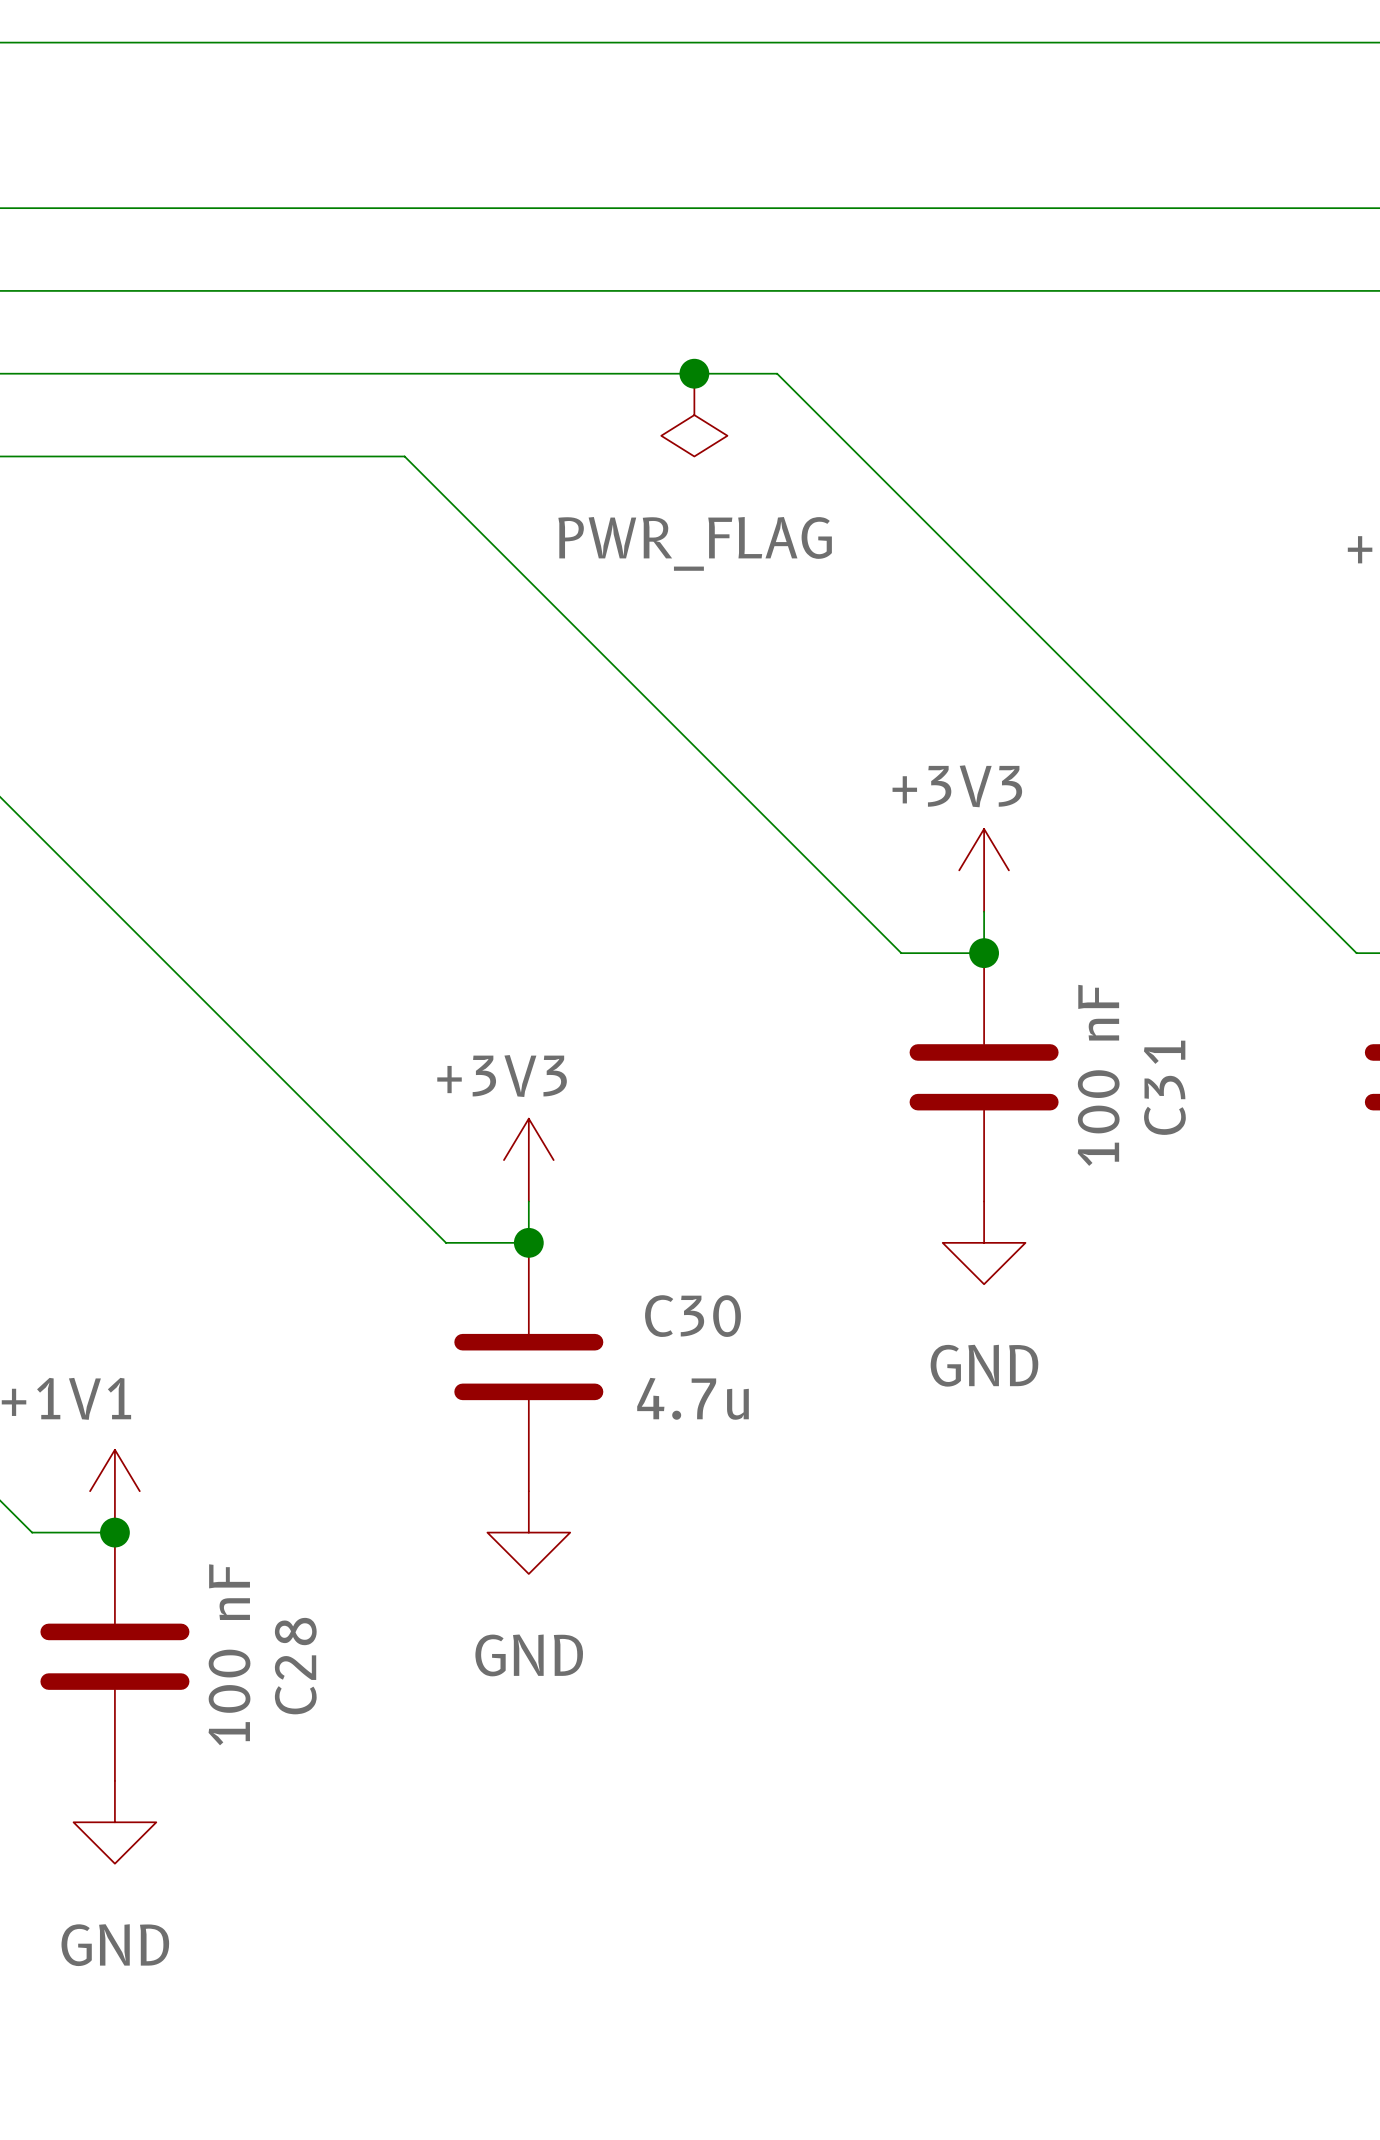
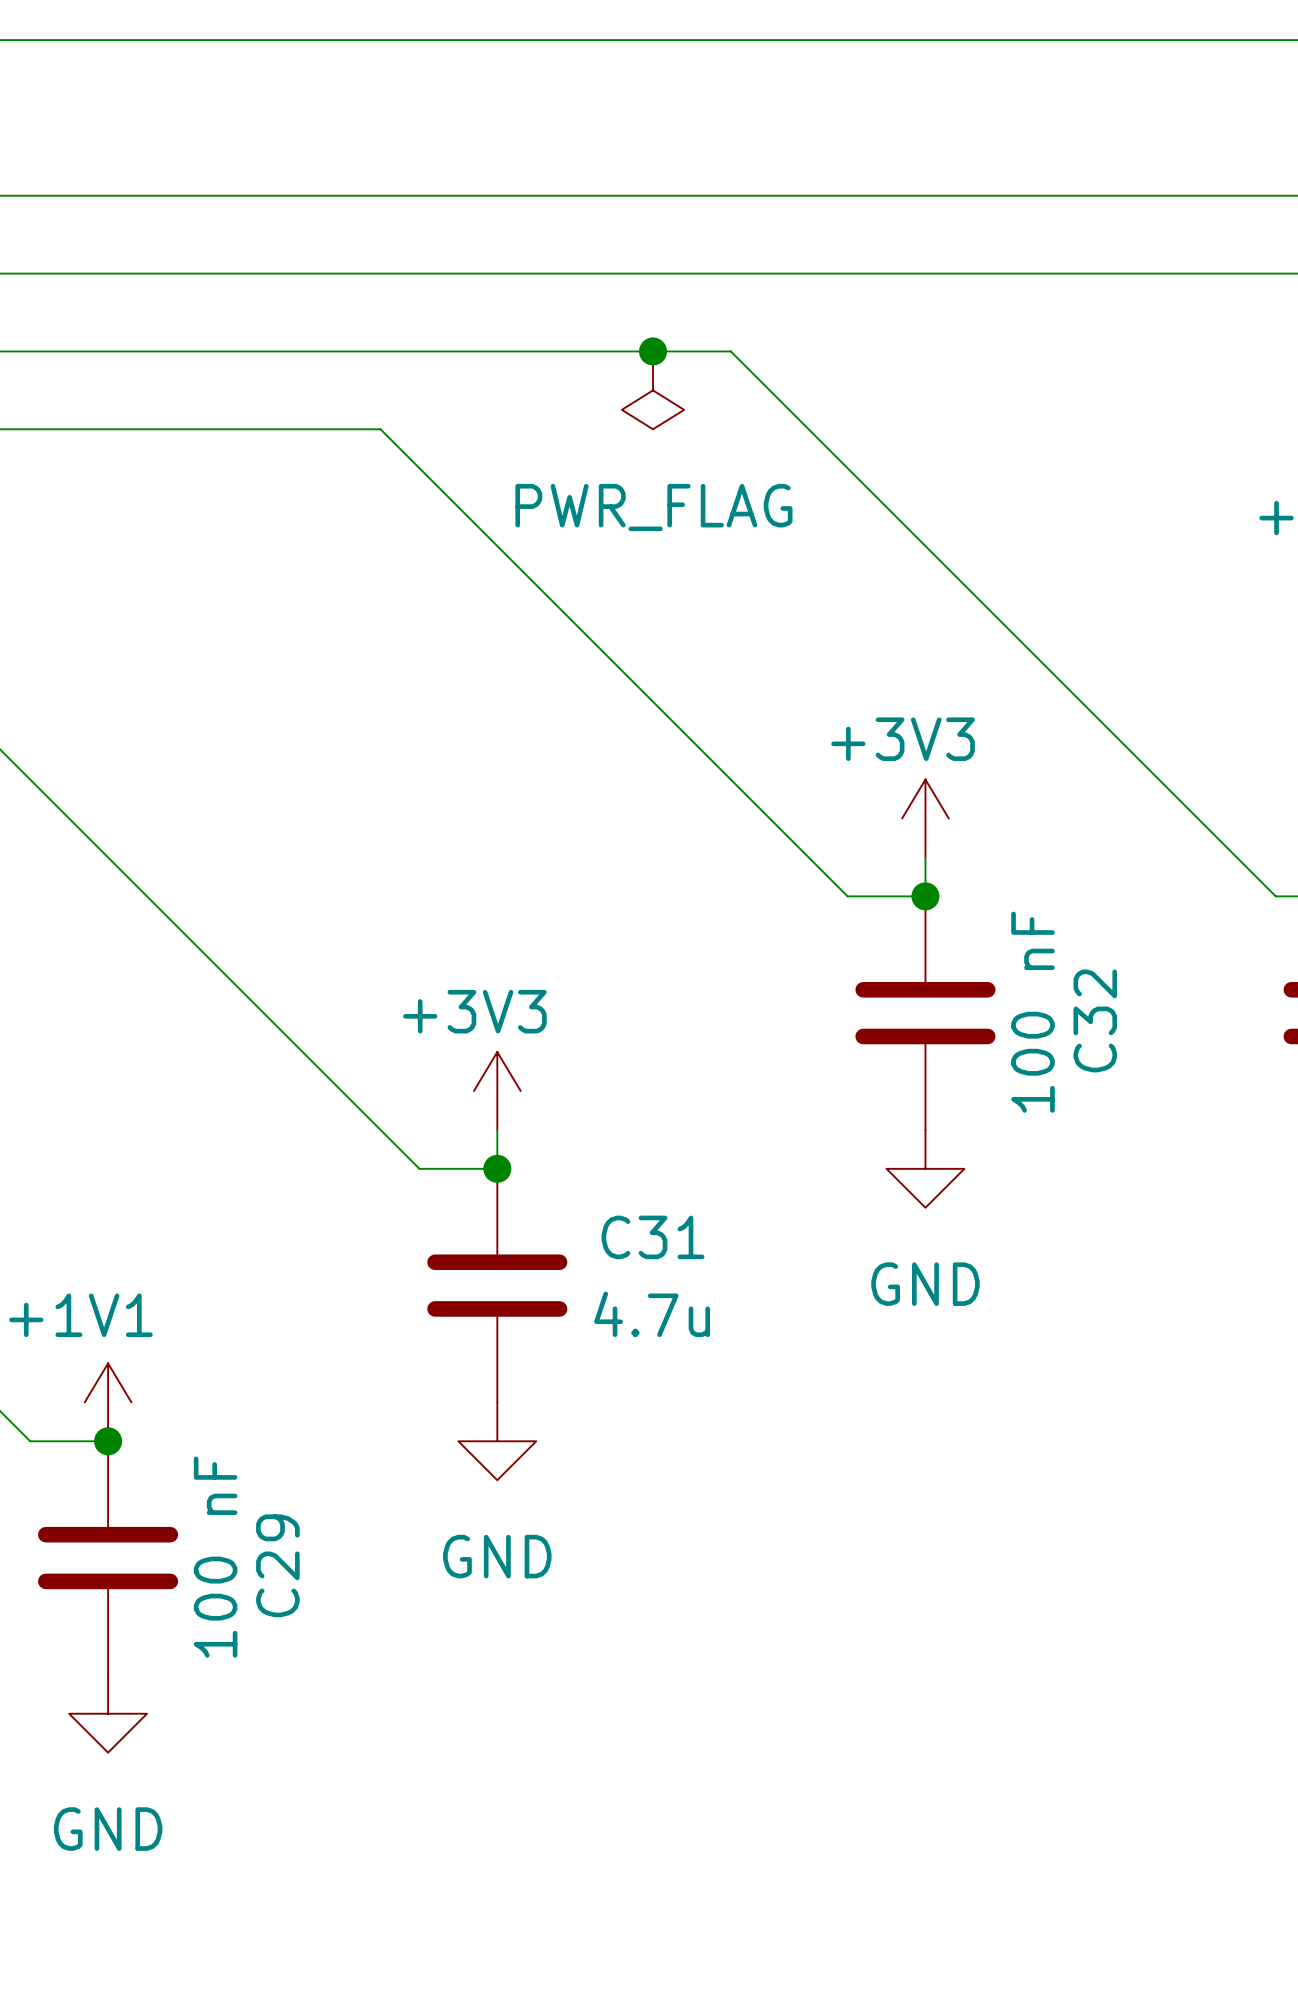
C31 name: C31 (1164, 1087) -> C32 (1095, 1020)
C30 name: C30 (693, 1316) -> C31 (653, 1237)
C28 name: C28 (295, 1666) -> C29 (277, 1565)

